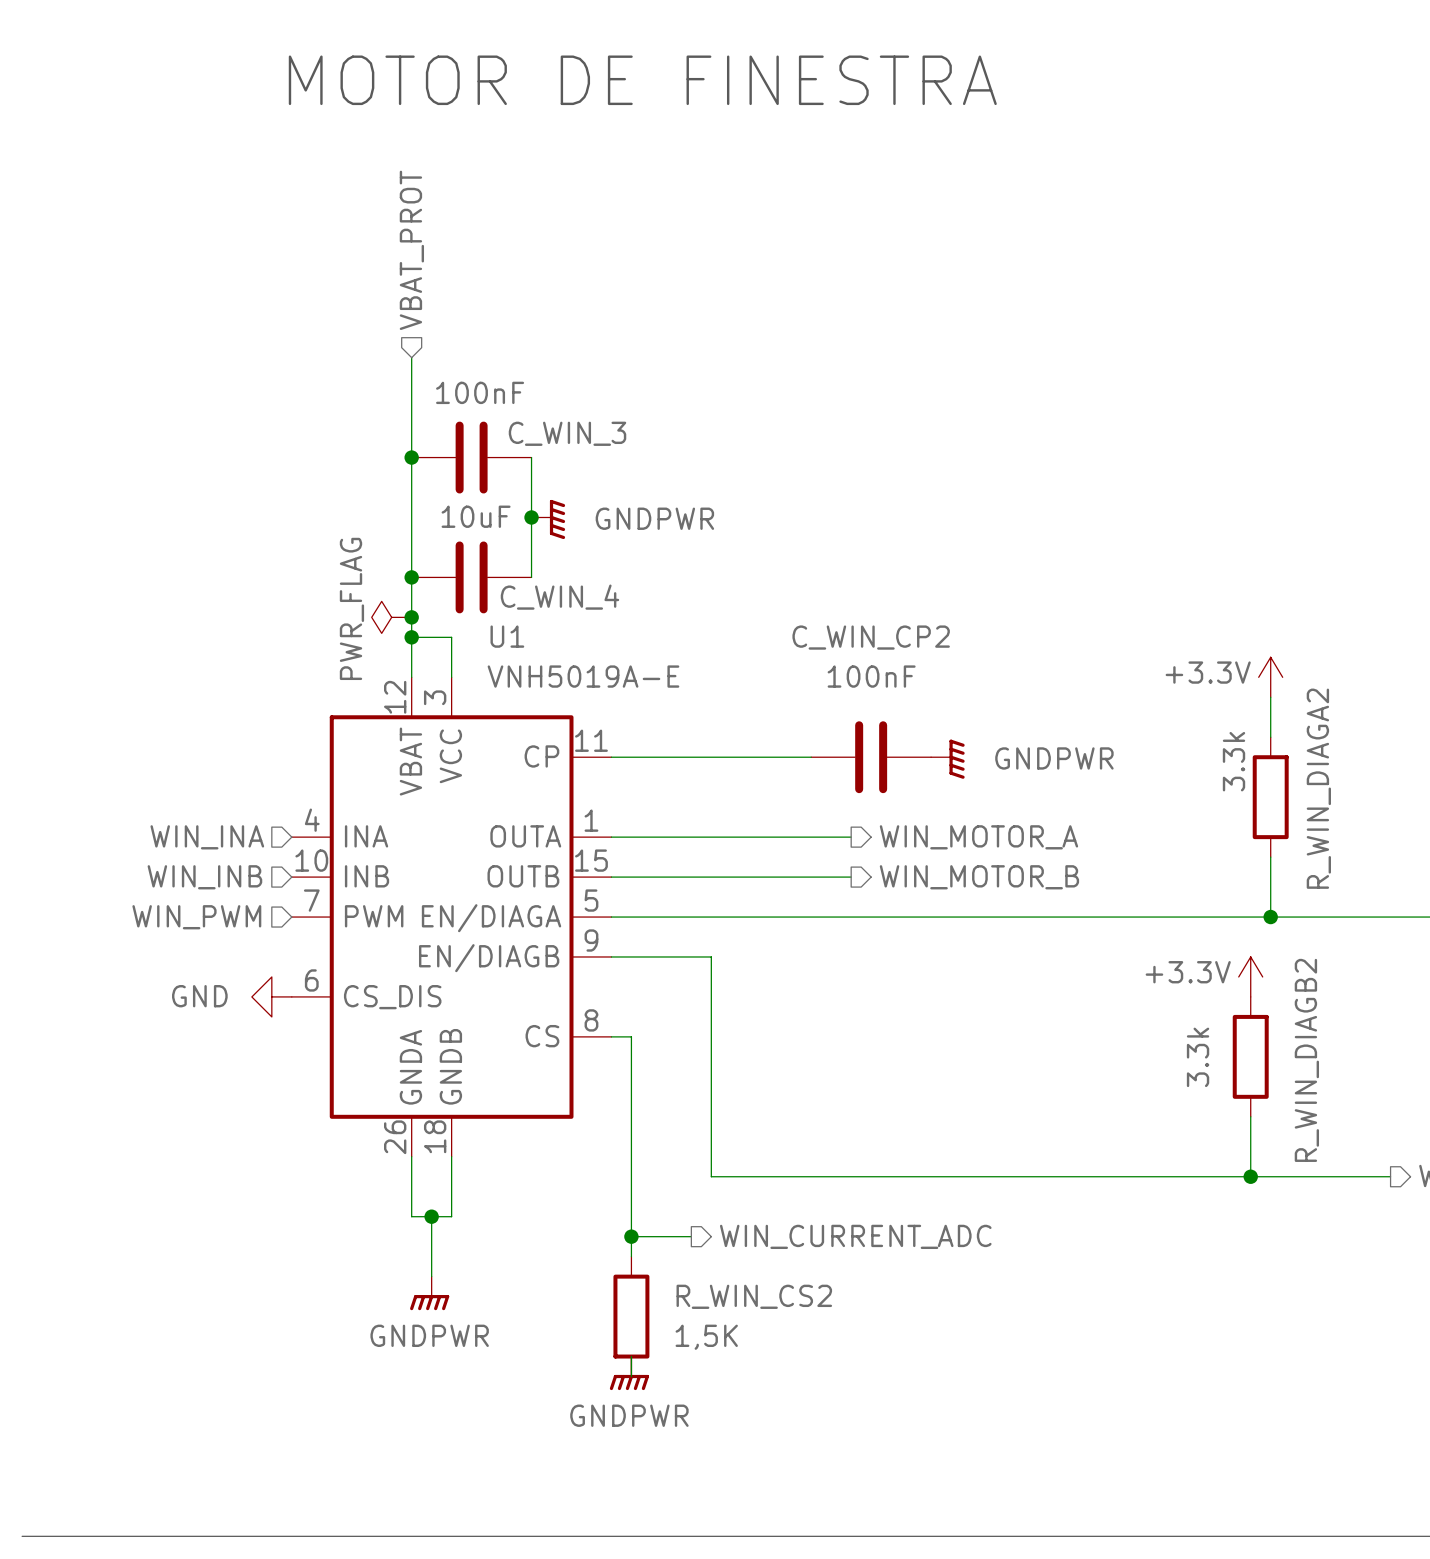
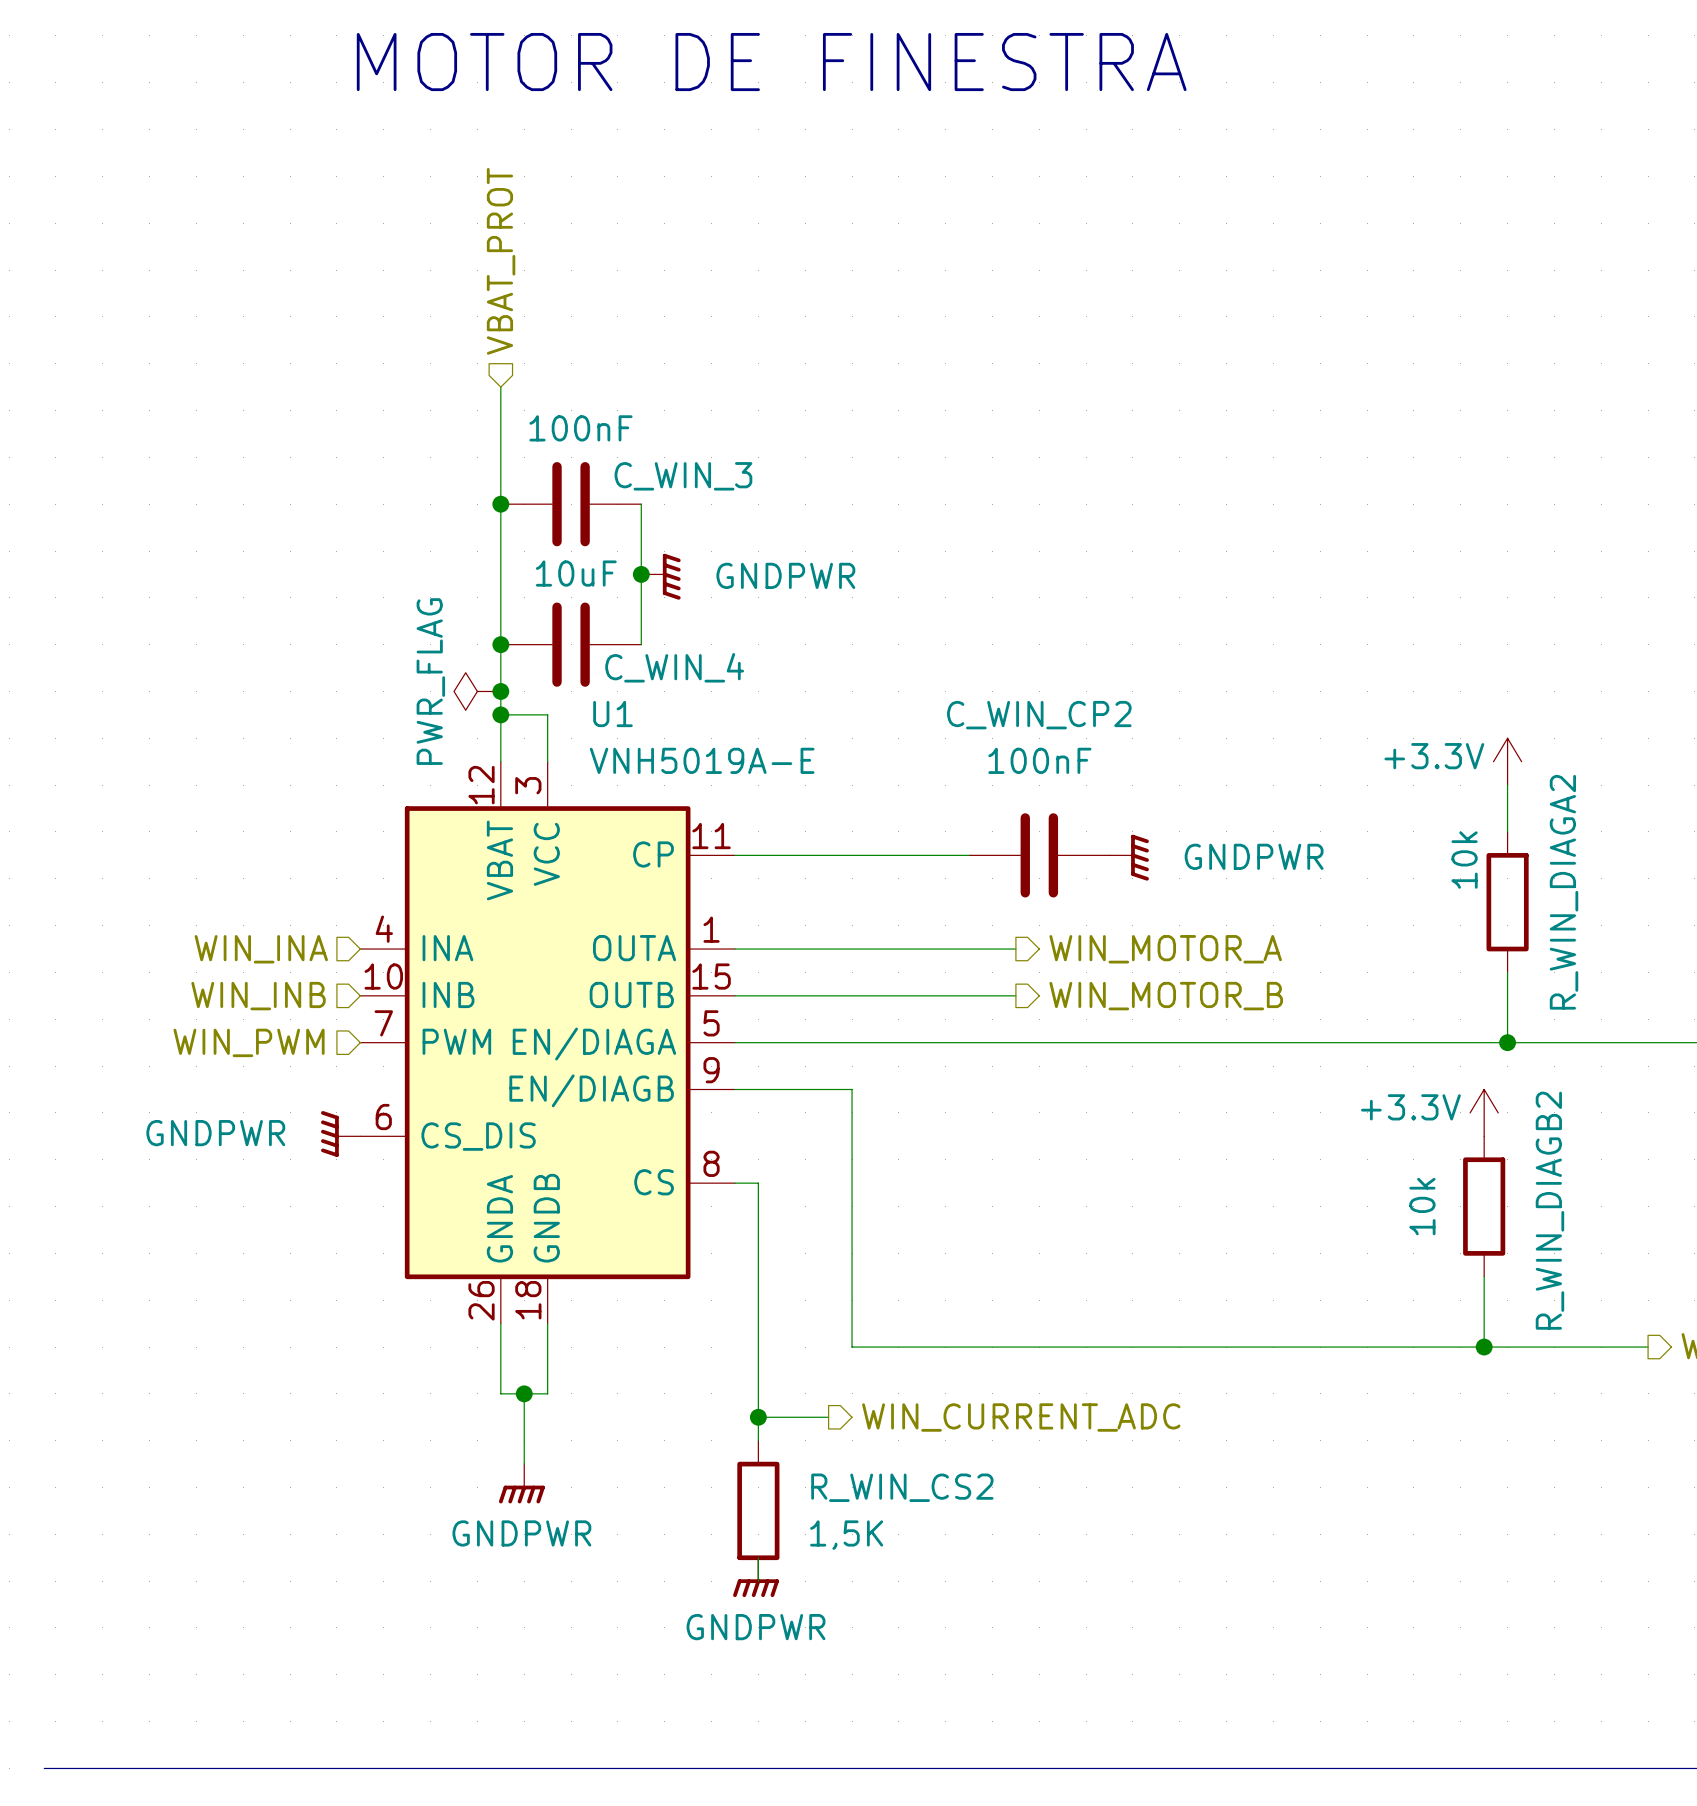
R_WIN_DIAGA2 value: 3.3k (1233, 761) -> 10k (1464, 860)
power symbol: GND (271, 996) -> GNDPWR (340, 1133)
R_WIN_DIAGB2 value: 3.3k (1198, 1057) -> 10k (1422, 1206)

